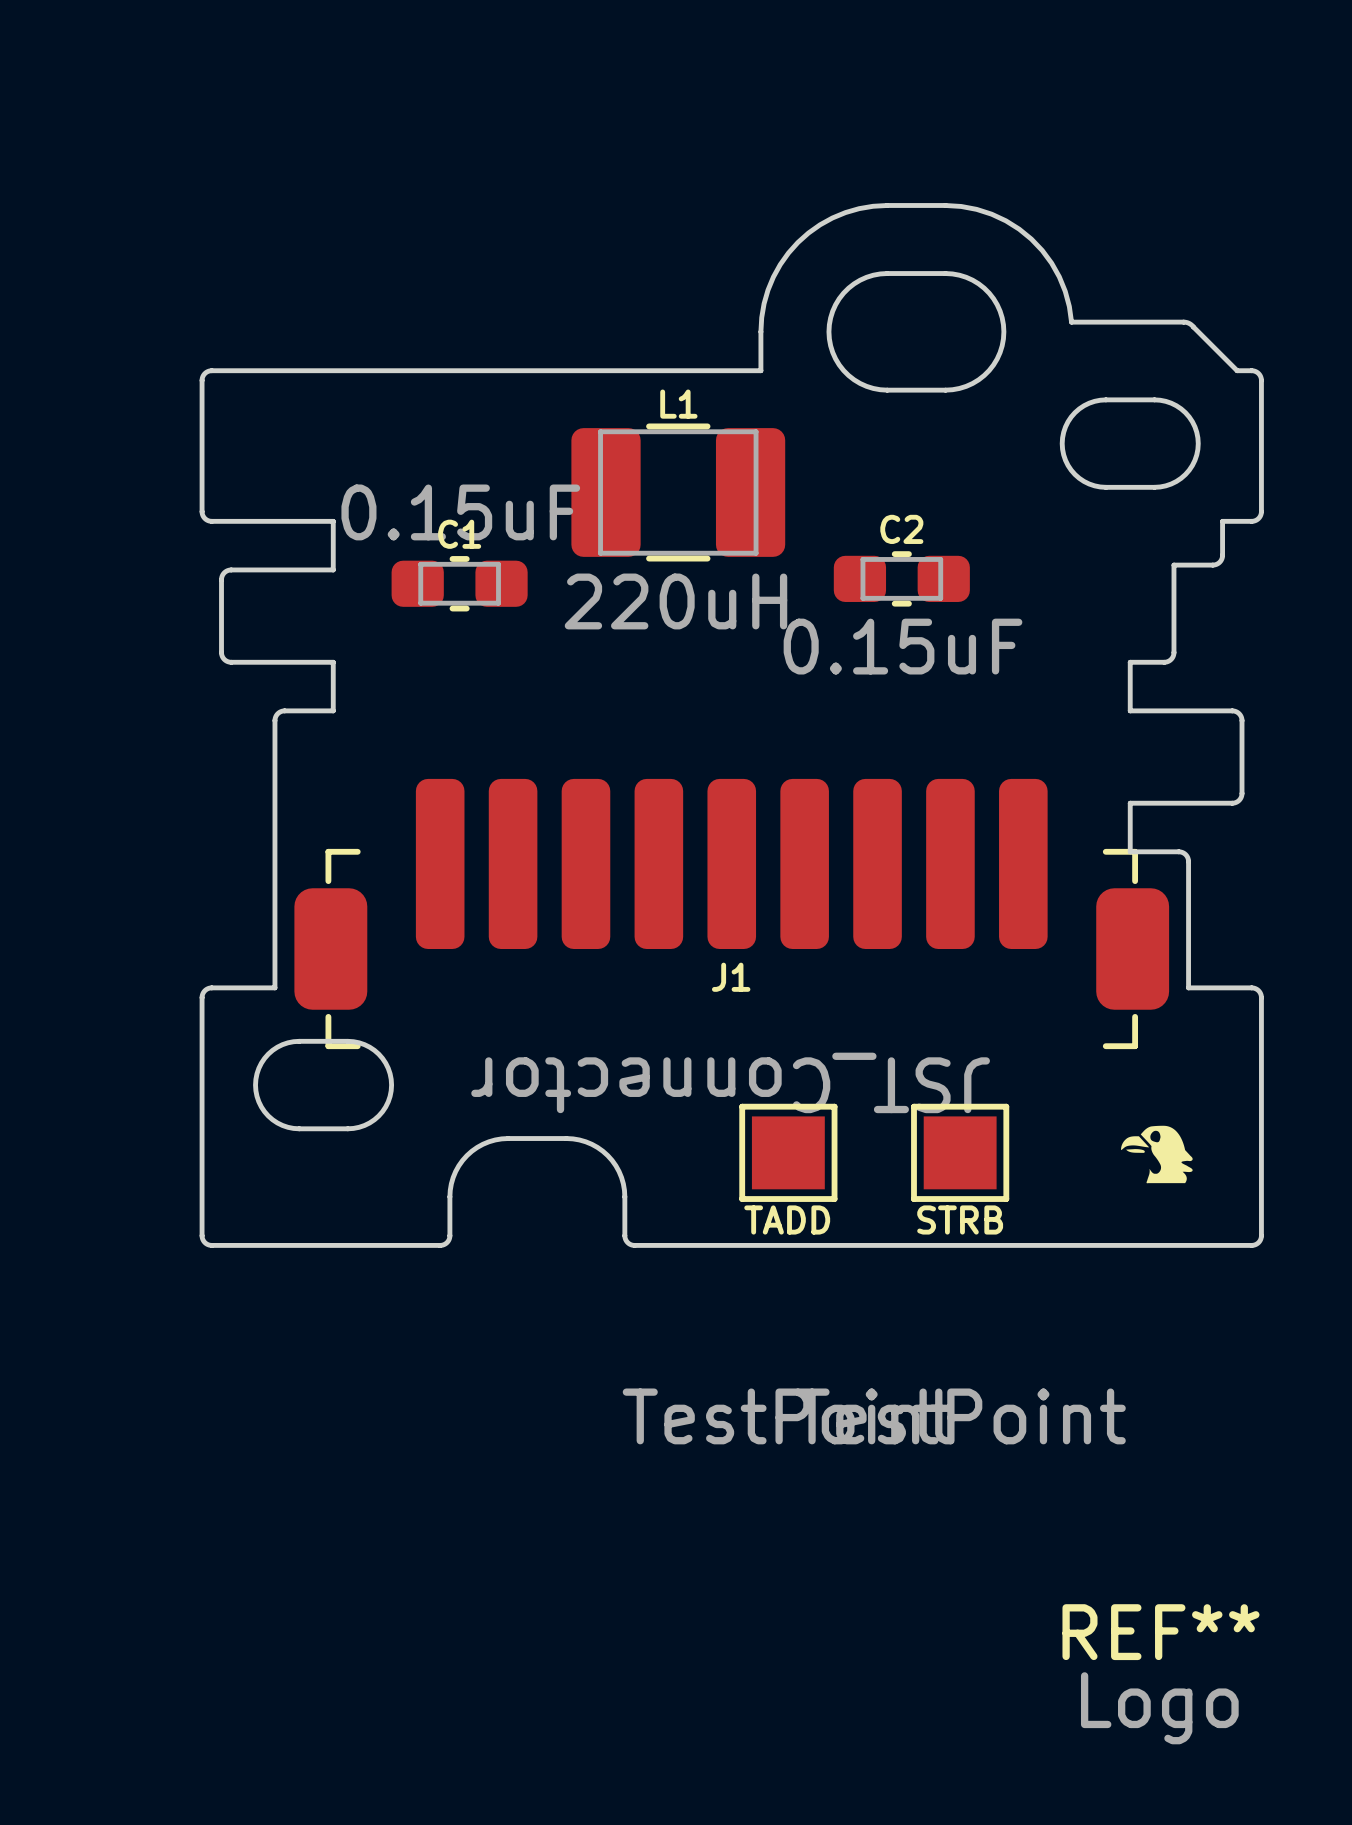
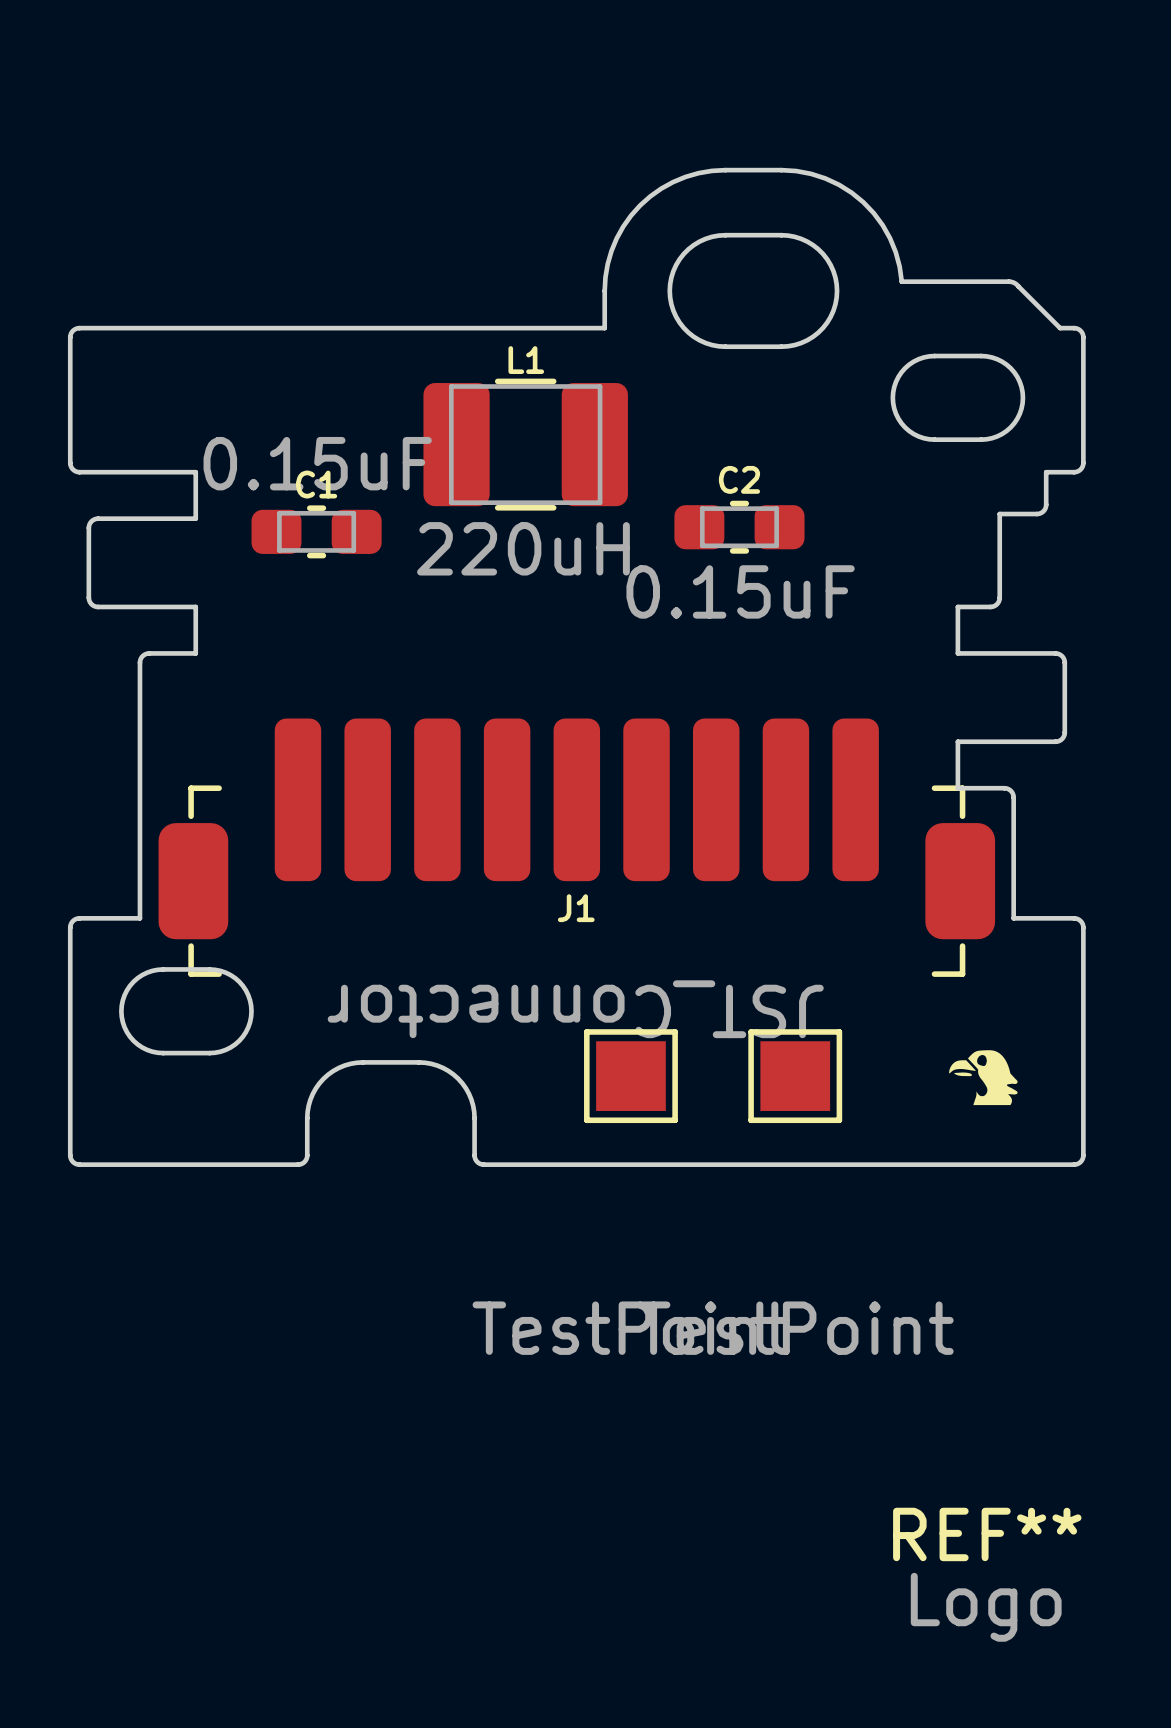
text: TADD (787, 1219) -> none
text: STRB (960, 1219) -> none

